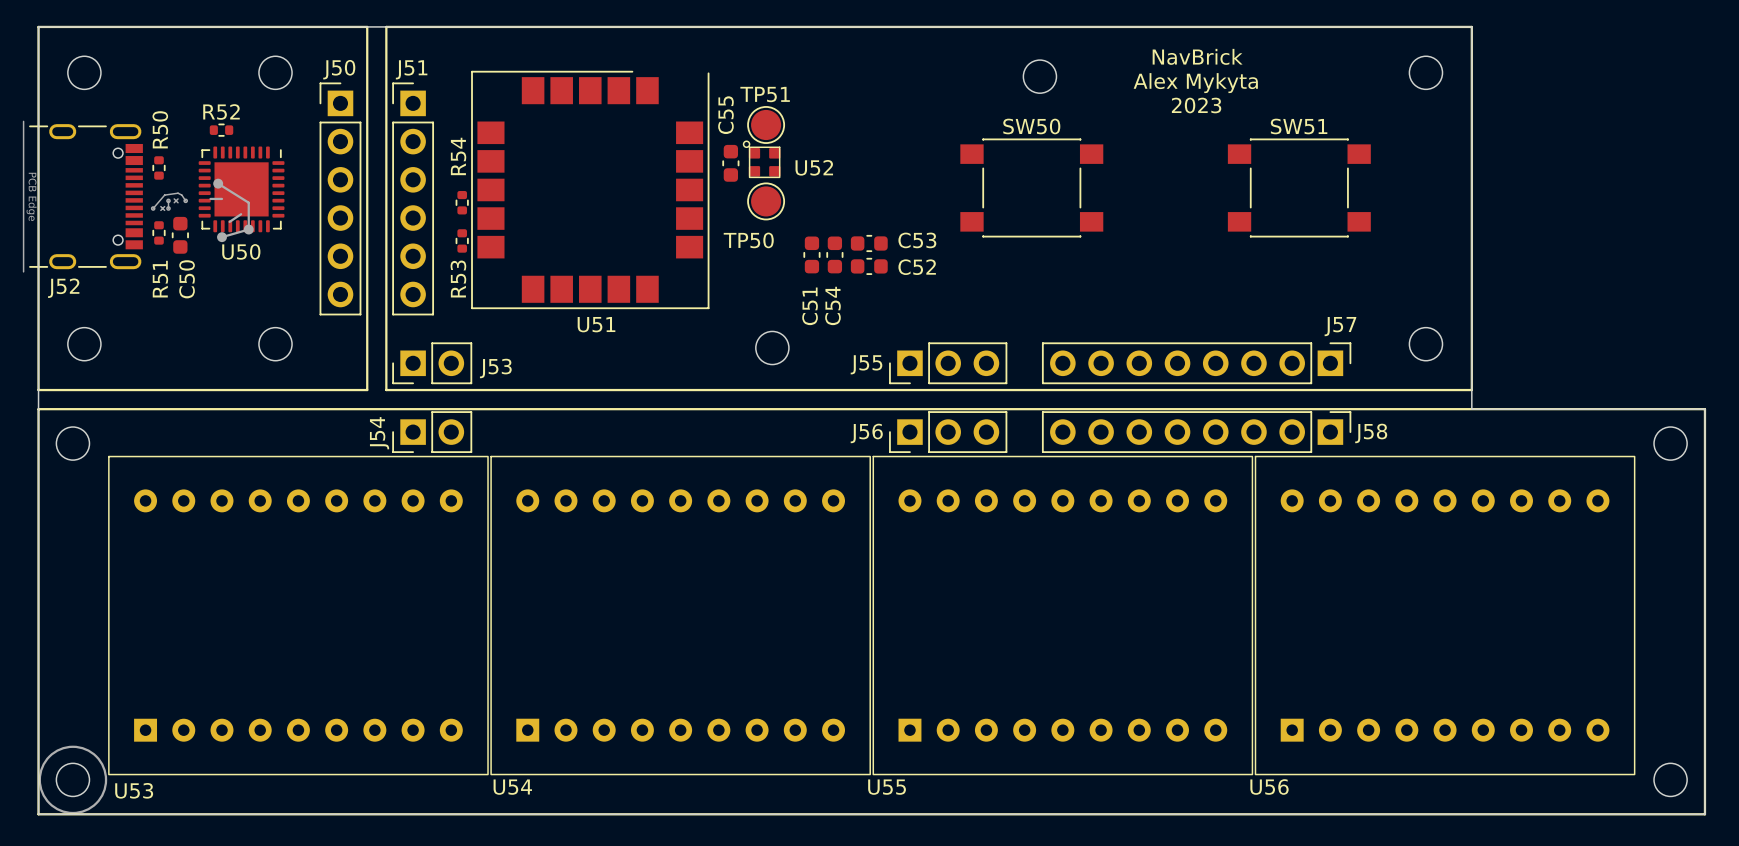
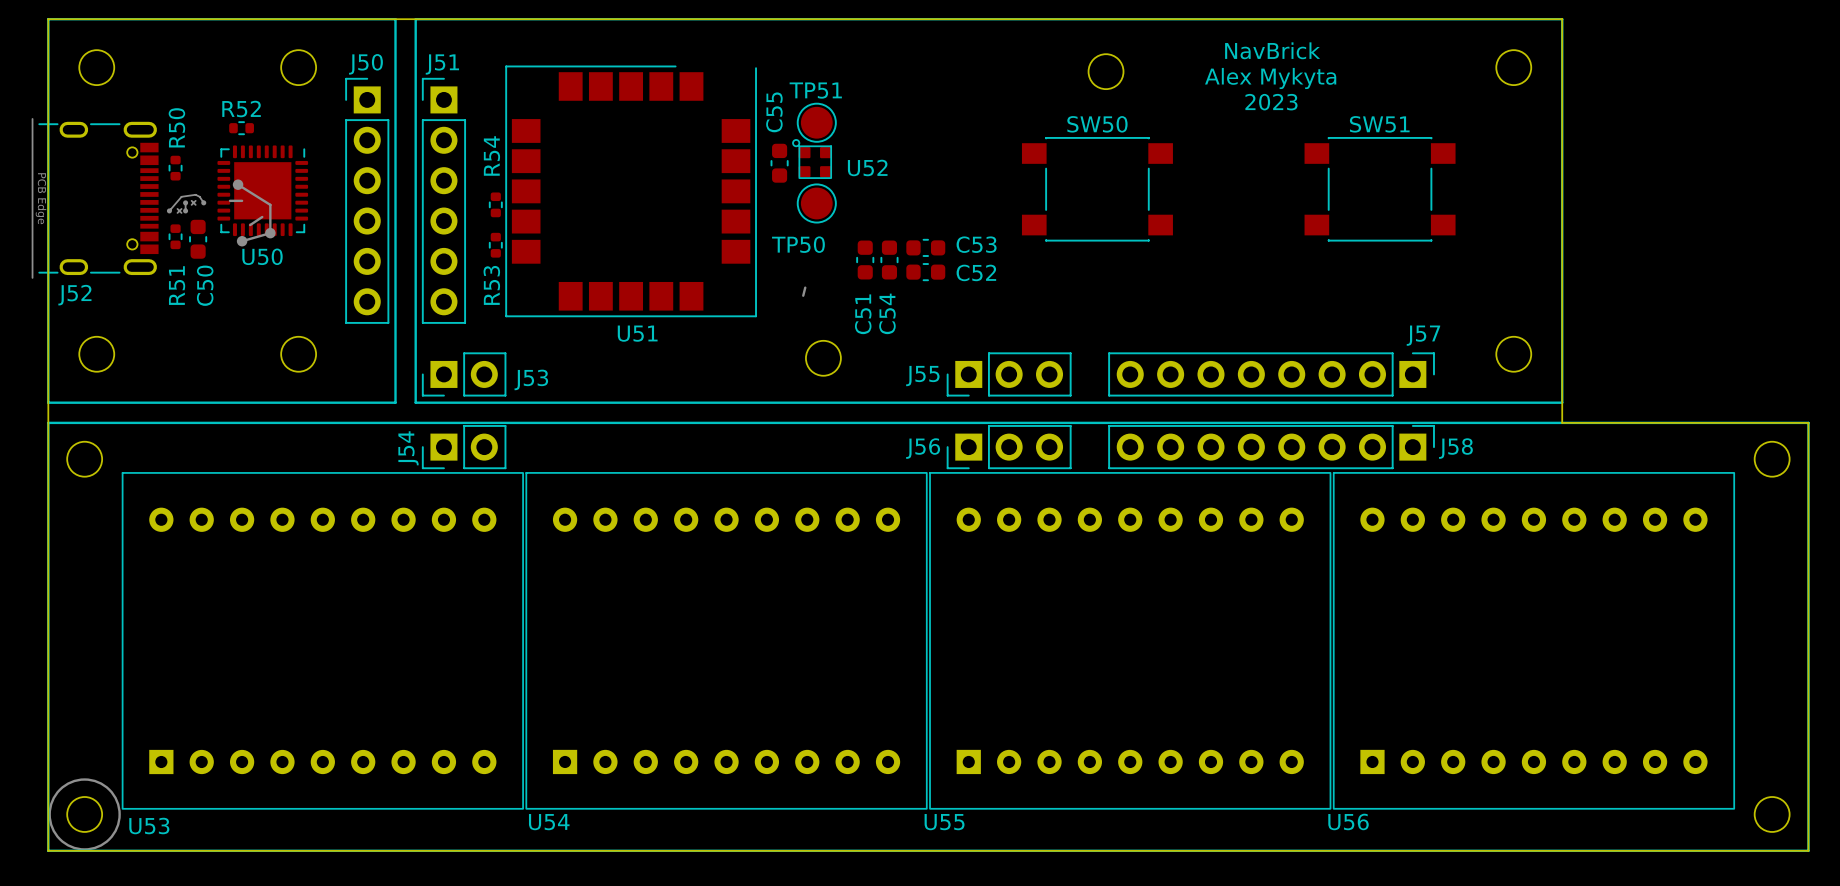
line: none -> (805, 287) (803, 295)

